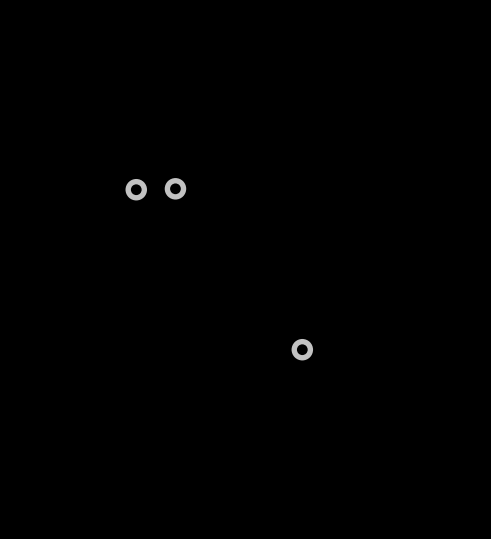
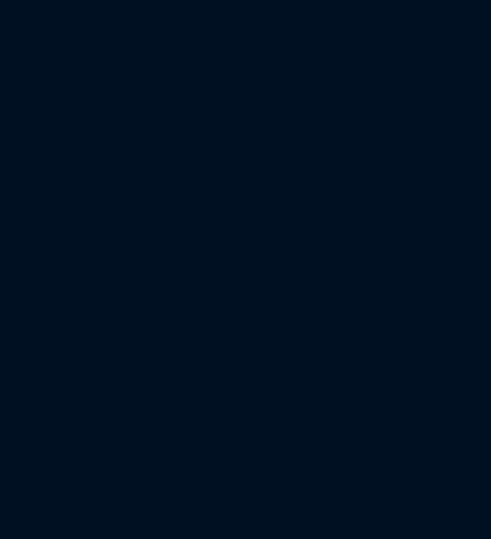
via: (175, 188) -> none
via: (136, 189) -> none
via: (302, 349) -> none

